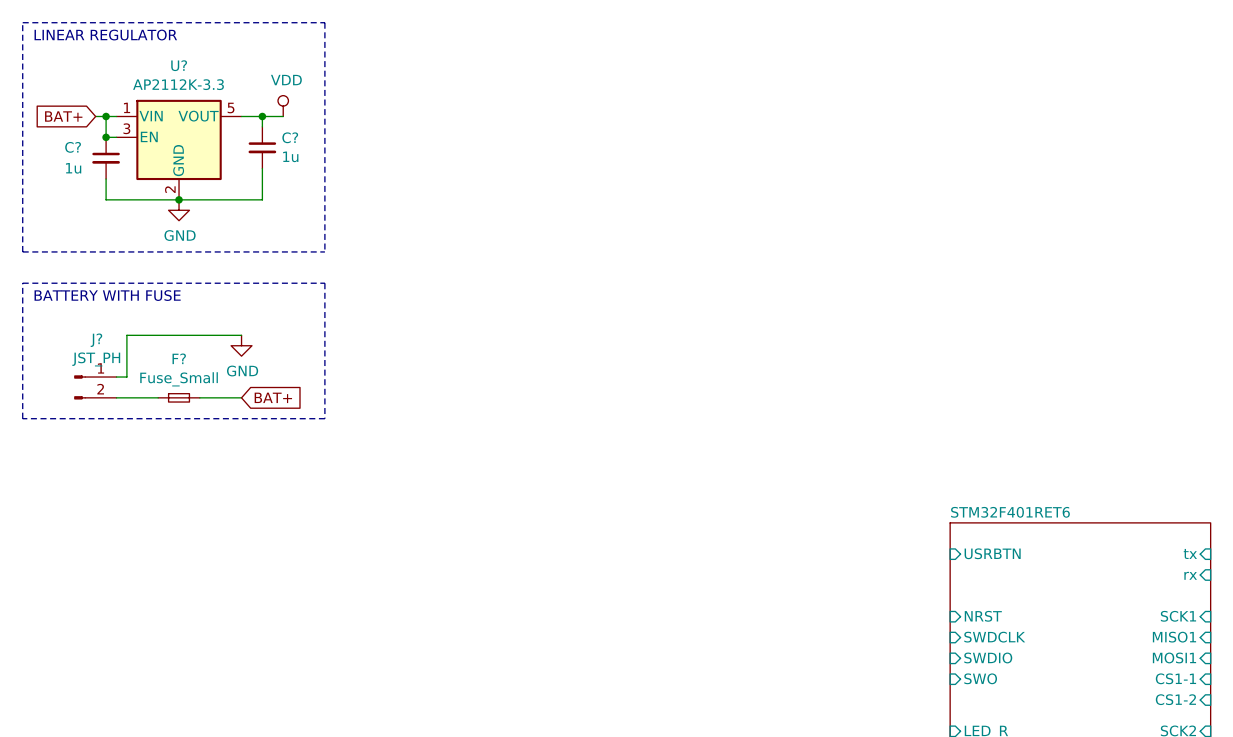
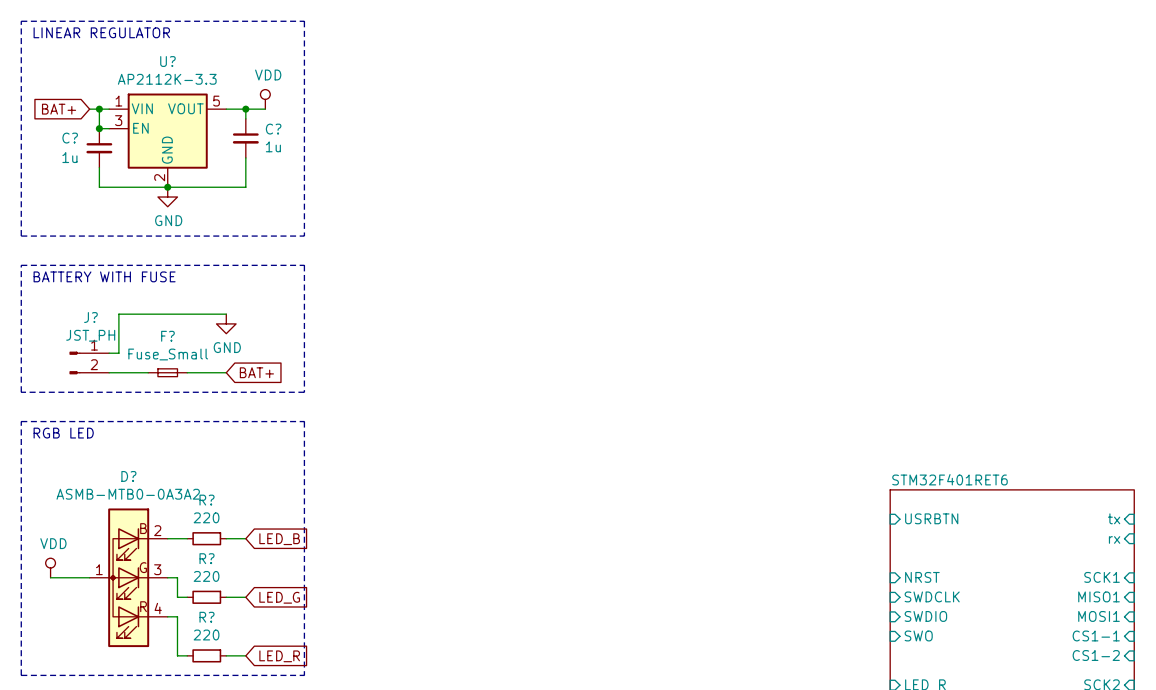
line: none -> (21, 421) (304, 421) (304, 675) (21, 675) (21, 421)
text: none -> RGB LED (63, 433)
wire: none -> (167, 538) (187, 538)
R?: none -> 220 (206, 538)
wire: none -> (226, 538) (245, 538)
global label: none -> LED_B (279, 539)
power symbol: none -> VDD (50, 568)
wire: none -> (50, 577) (89, 577)
D?: none -> ASMB-MTB0-0A3A2 (128, 577)
wire: none -> (167, 577) (177, 577) (177, 597) (187, 597)
R?: none -> 220 (206, 597)
wire: none -> (226, 597) (245, 597)
global label: none -> LED_G (279, 597)
wire: none -> (167, 616) (177, 616) (177, 655) (187, 655)
R?: none -> 220 (206, 655)
wire: none -> (226, 655) (245, 655)
global label: none -> LED_R (279, 656)

